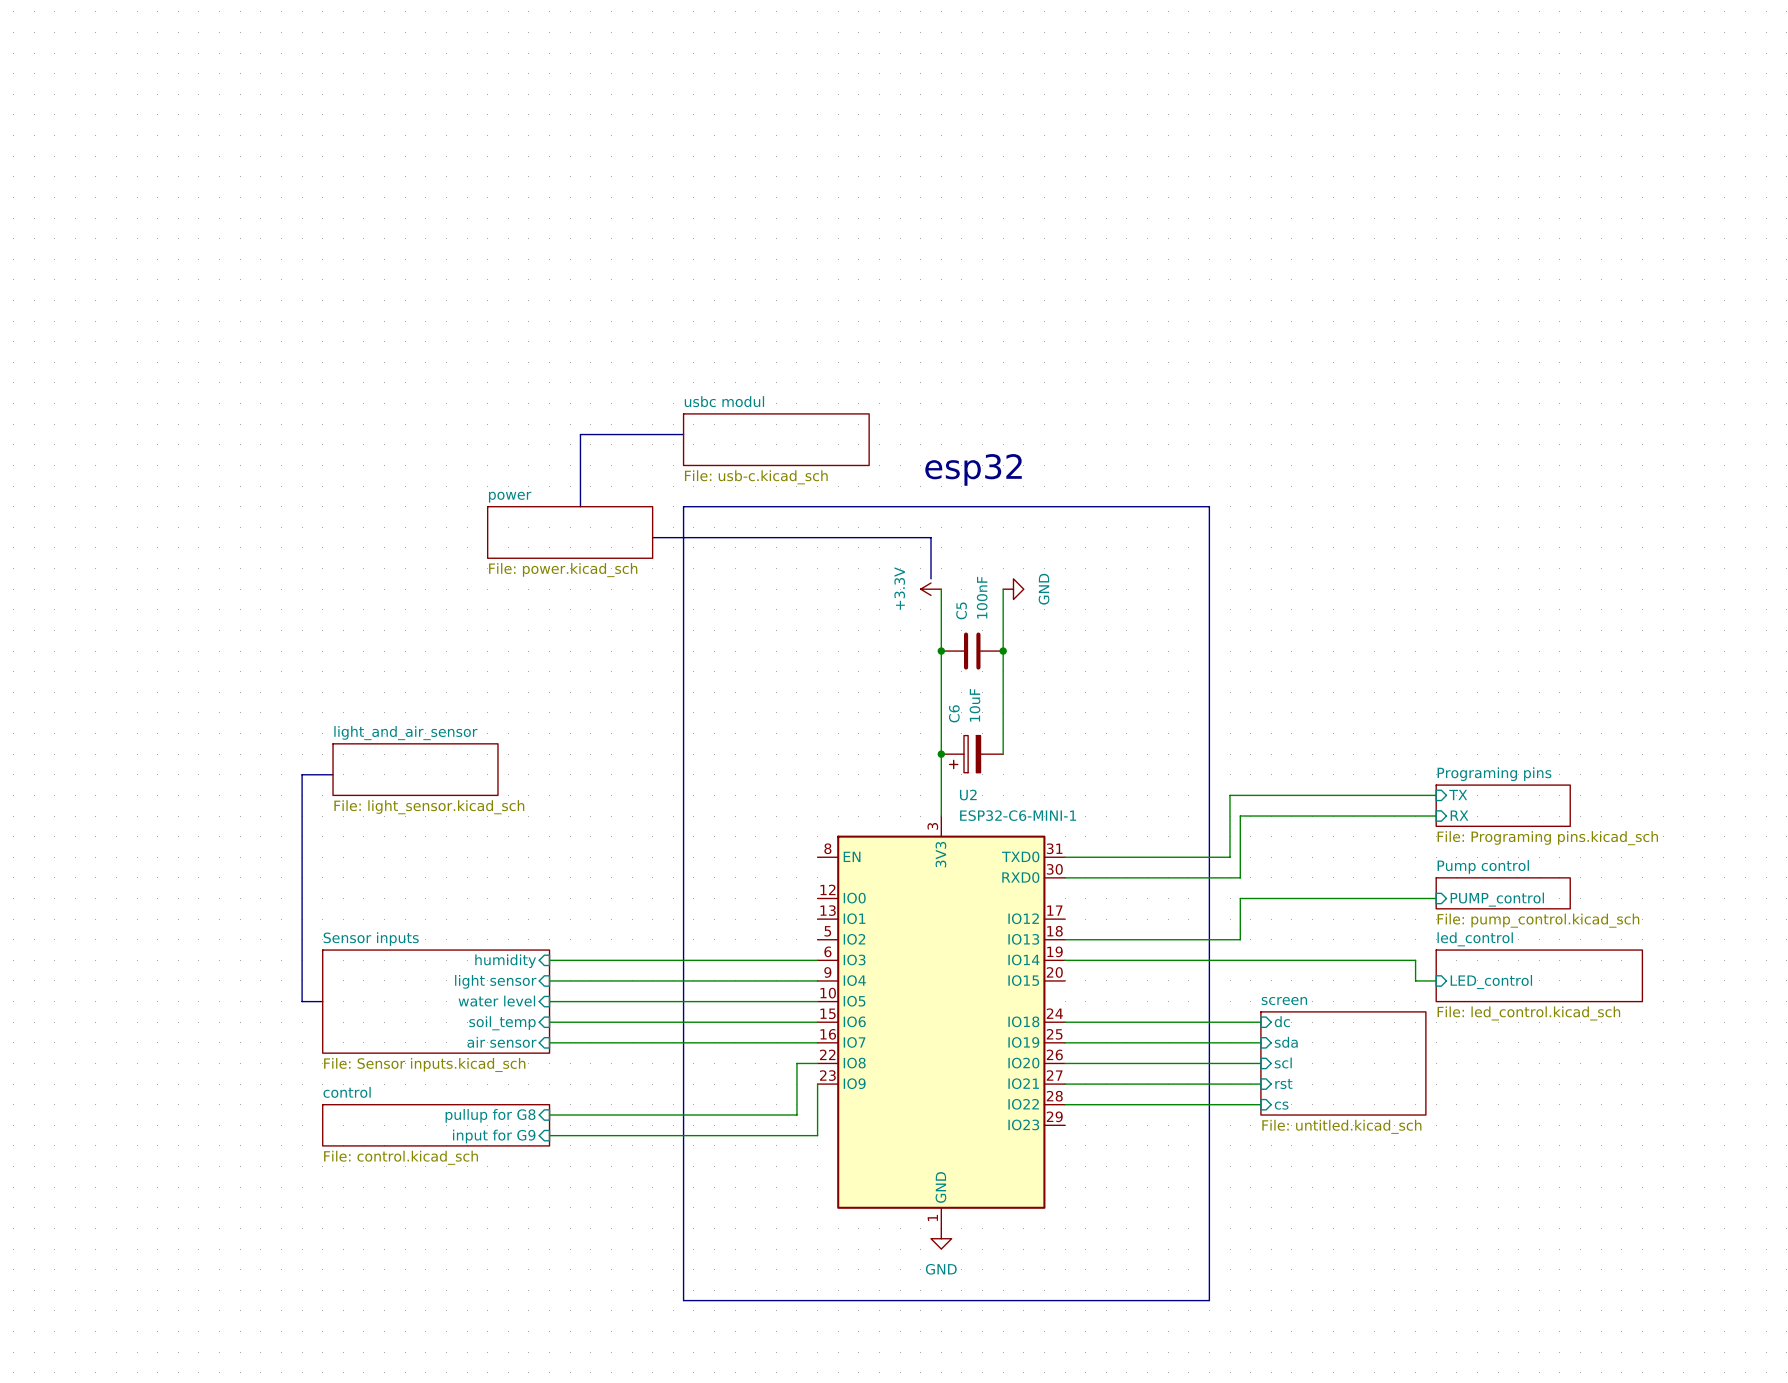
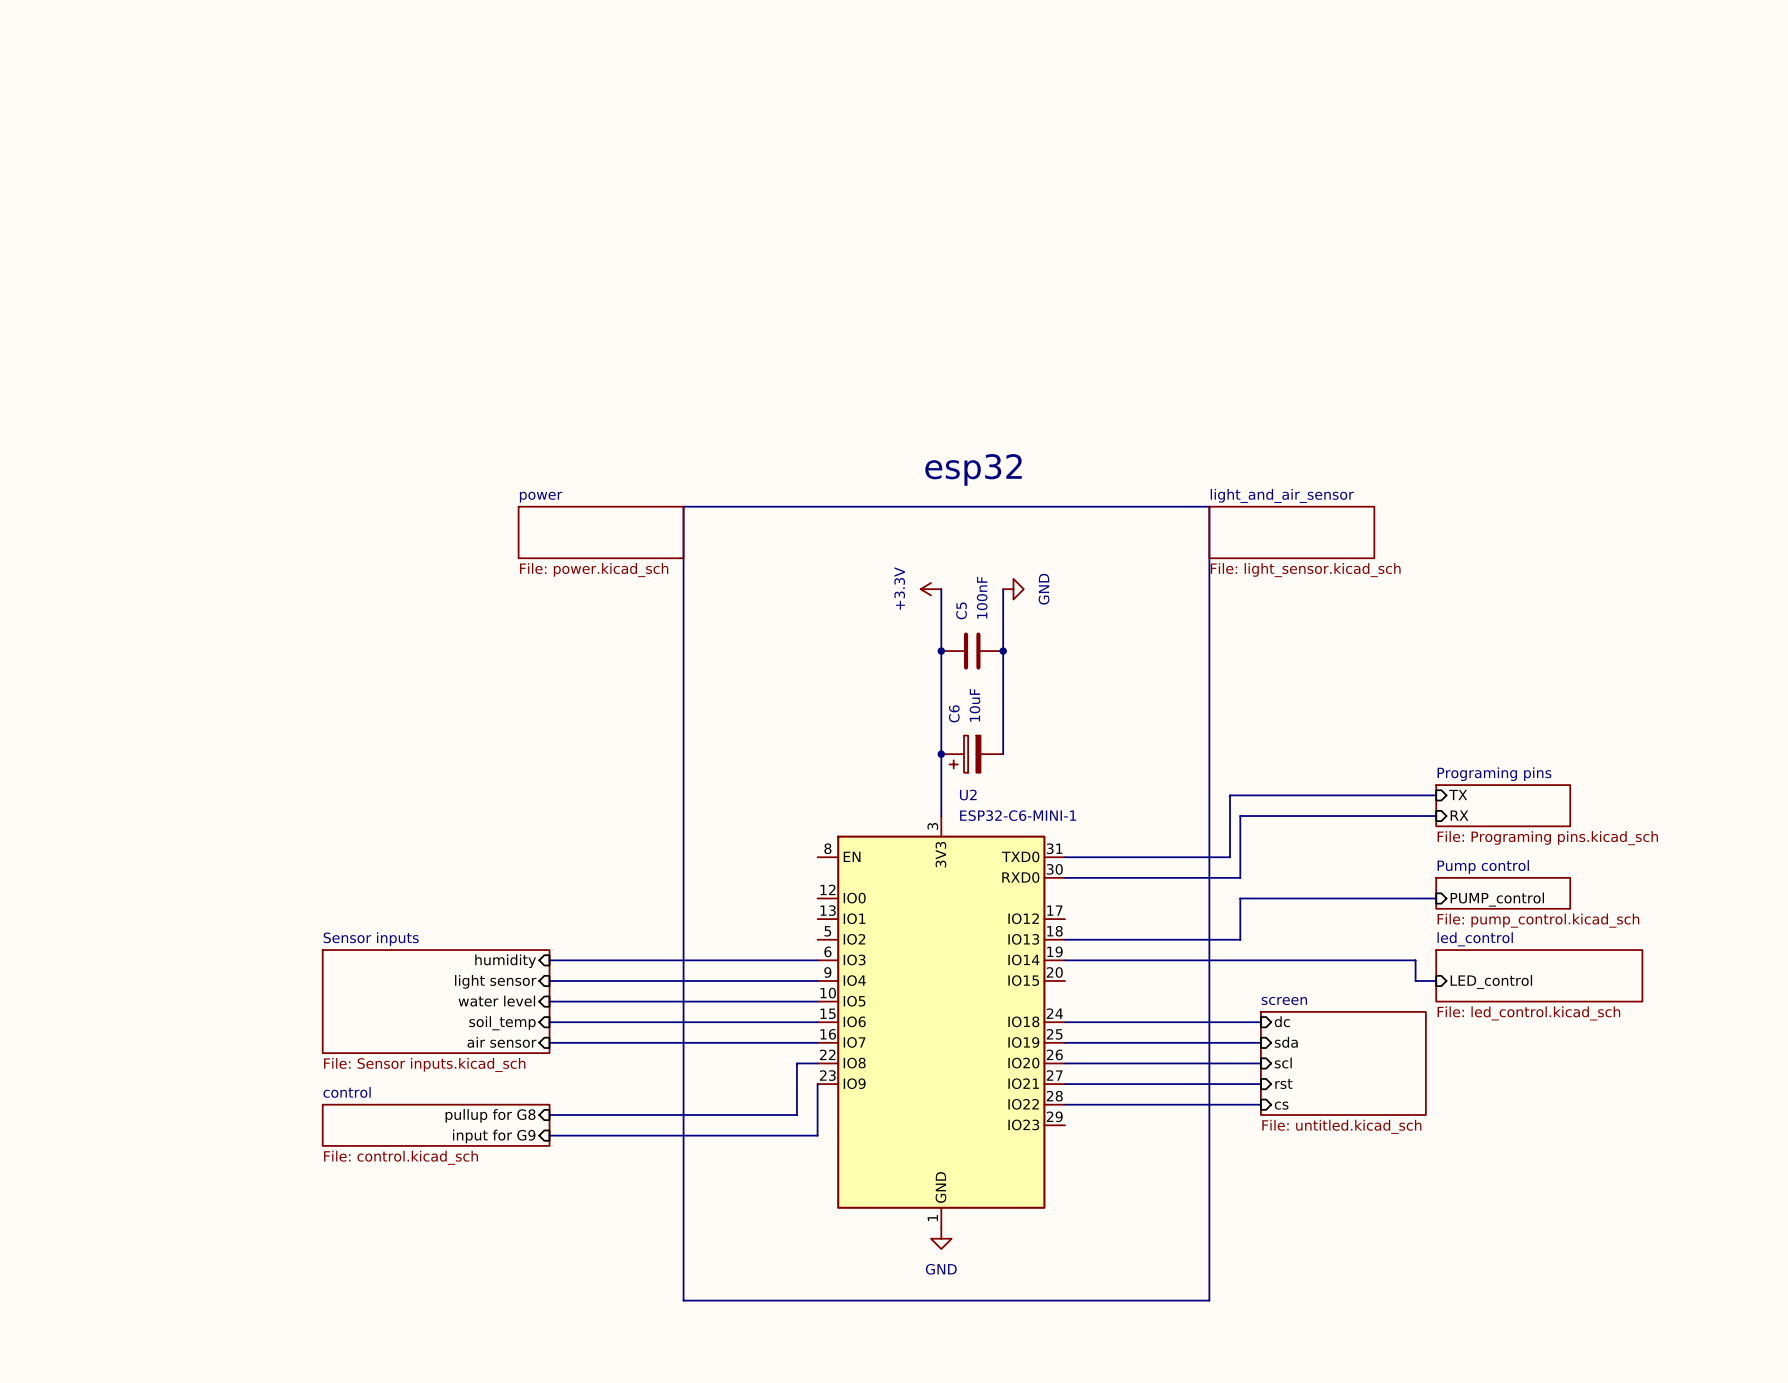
line: (683, 434) (580, 434) (580, 506) -> none
sheet usbc modul: File: usb-c.kicad_sch (776, 439) -> none
sheet power position: (570, 532) -> (601, 532)
sheet light_and_air_sensor: none -> File: light_sensor.kicad_sch (1291, 532)
line: (652, 537) (931, 537) (931, 578) -> none
sheet light_and_air_sensor: File: light_sensor.kicad_sch (415, 769) -> none
line: (333, 774) (302, 774) (302, 1001) (322, 1001) -> none

